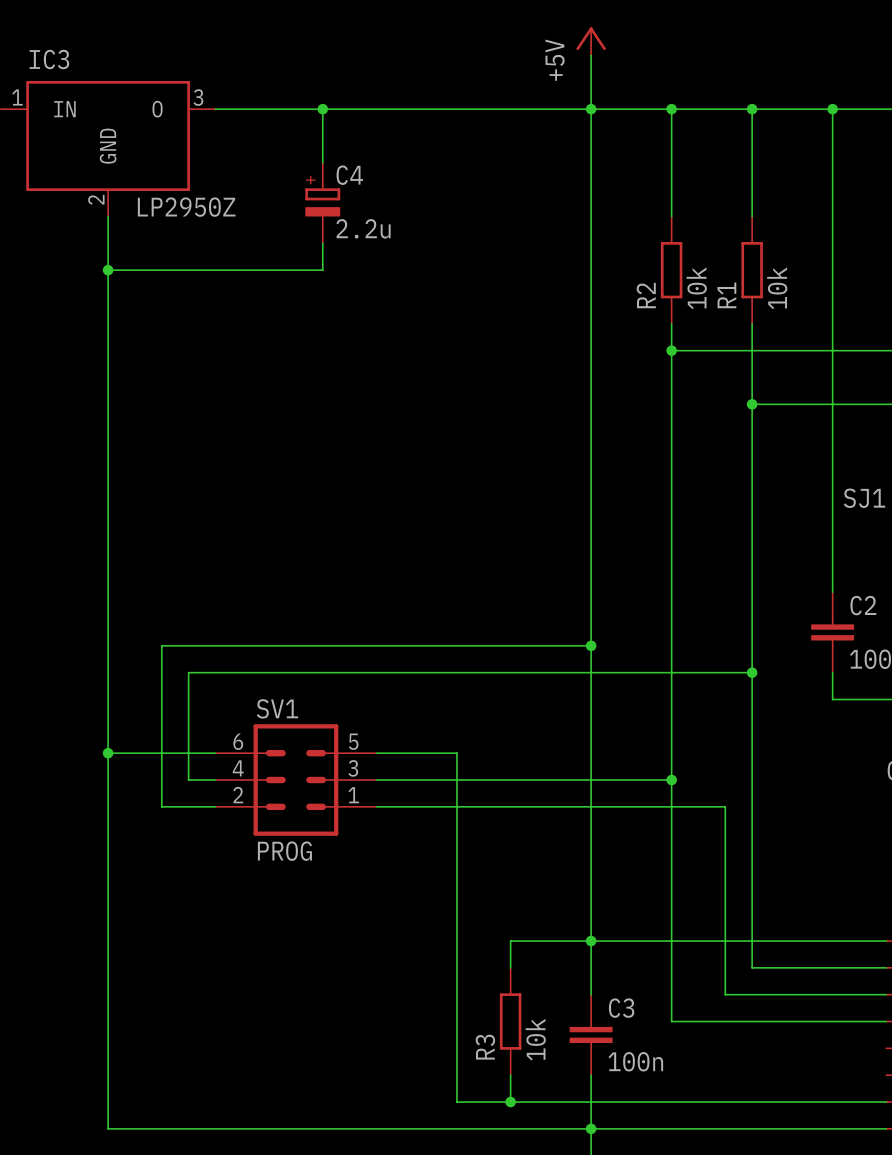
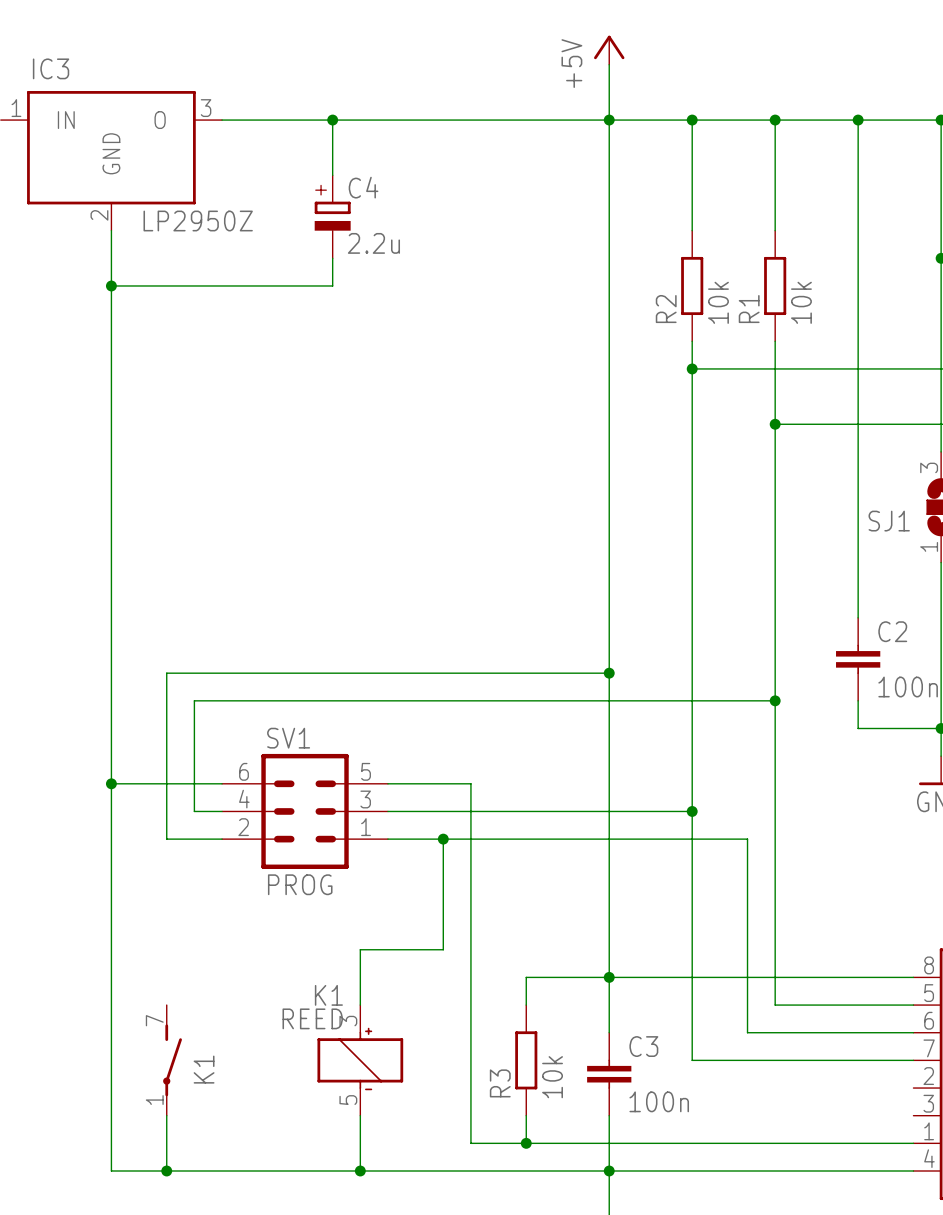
wire: none -> (443, 839) (443, 949) (360, 949) (360, 1005)
junction: none -> (443, 839)
K1: none -> (172, 1060)
K1: none -> REED (360, 1060)
wire: none -> (166, 1115) (166, 1171)
wire: none -> (360, 1115) (360, 1171)
junction: none -> (166, 1171)
junction: none -> (360, 1171)

